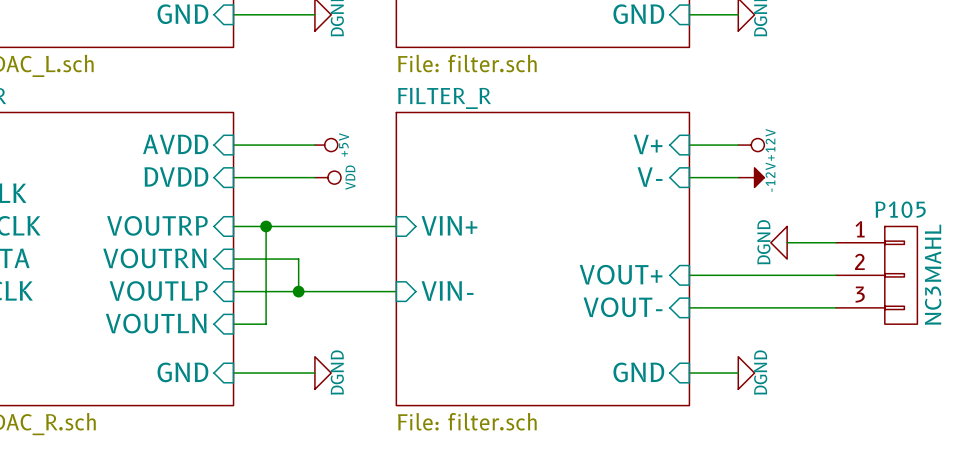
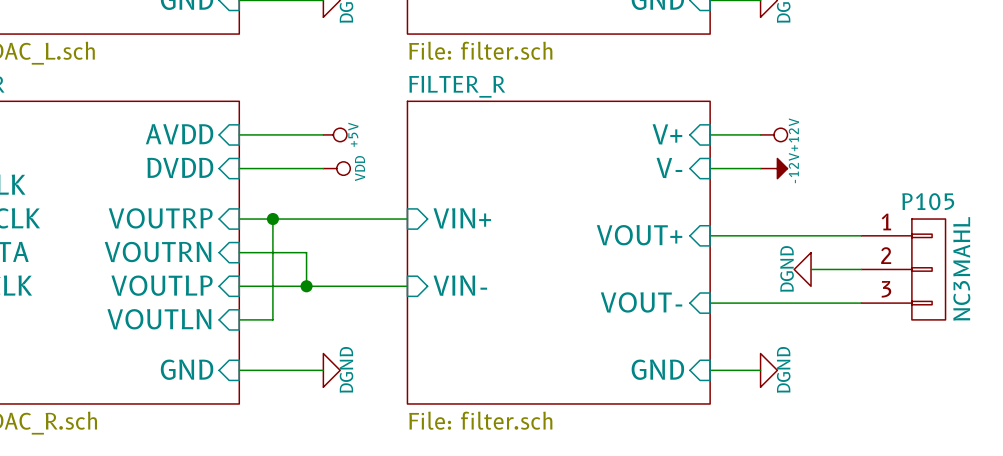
power symbol position: DGND (778, 242) -> DGND (802, 269)
sheet pin position: VOUT+ (621, 274) -> VOUT+ (639, 235)
wire: (689, 275) (787, 275) -> (710, 235) (811, 235)

